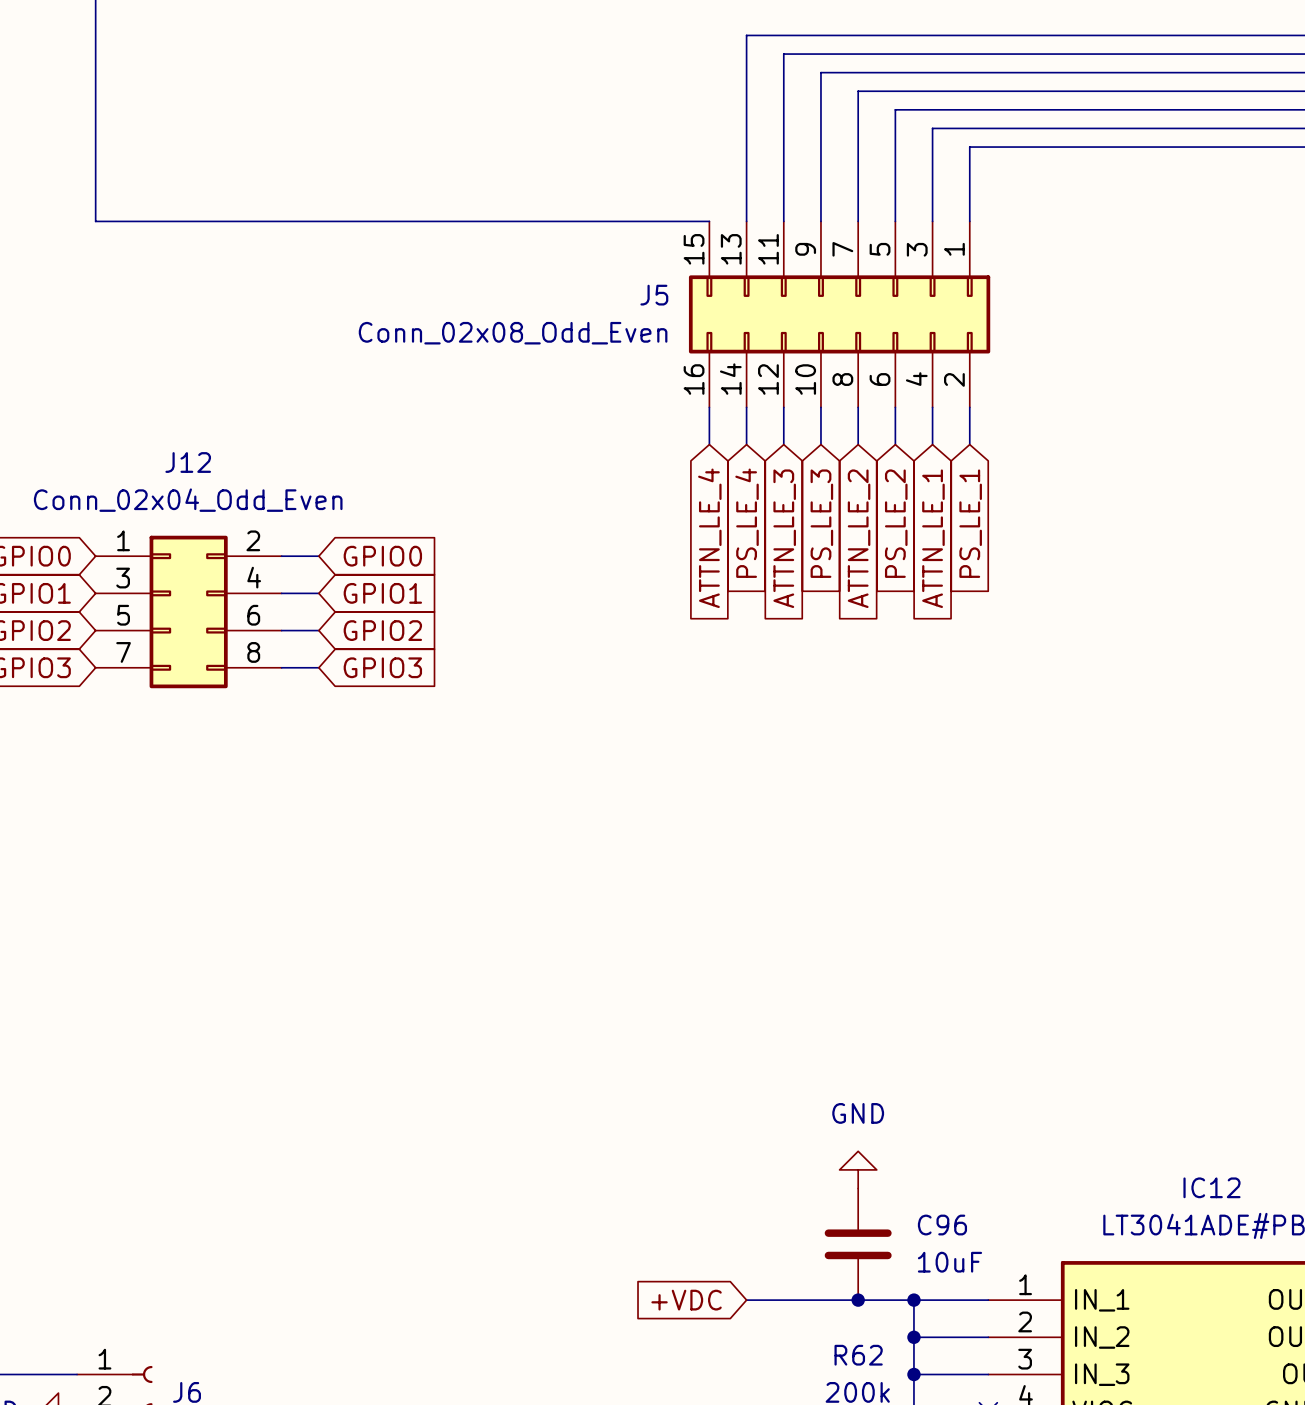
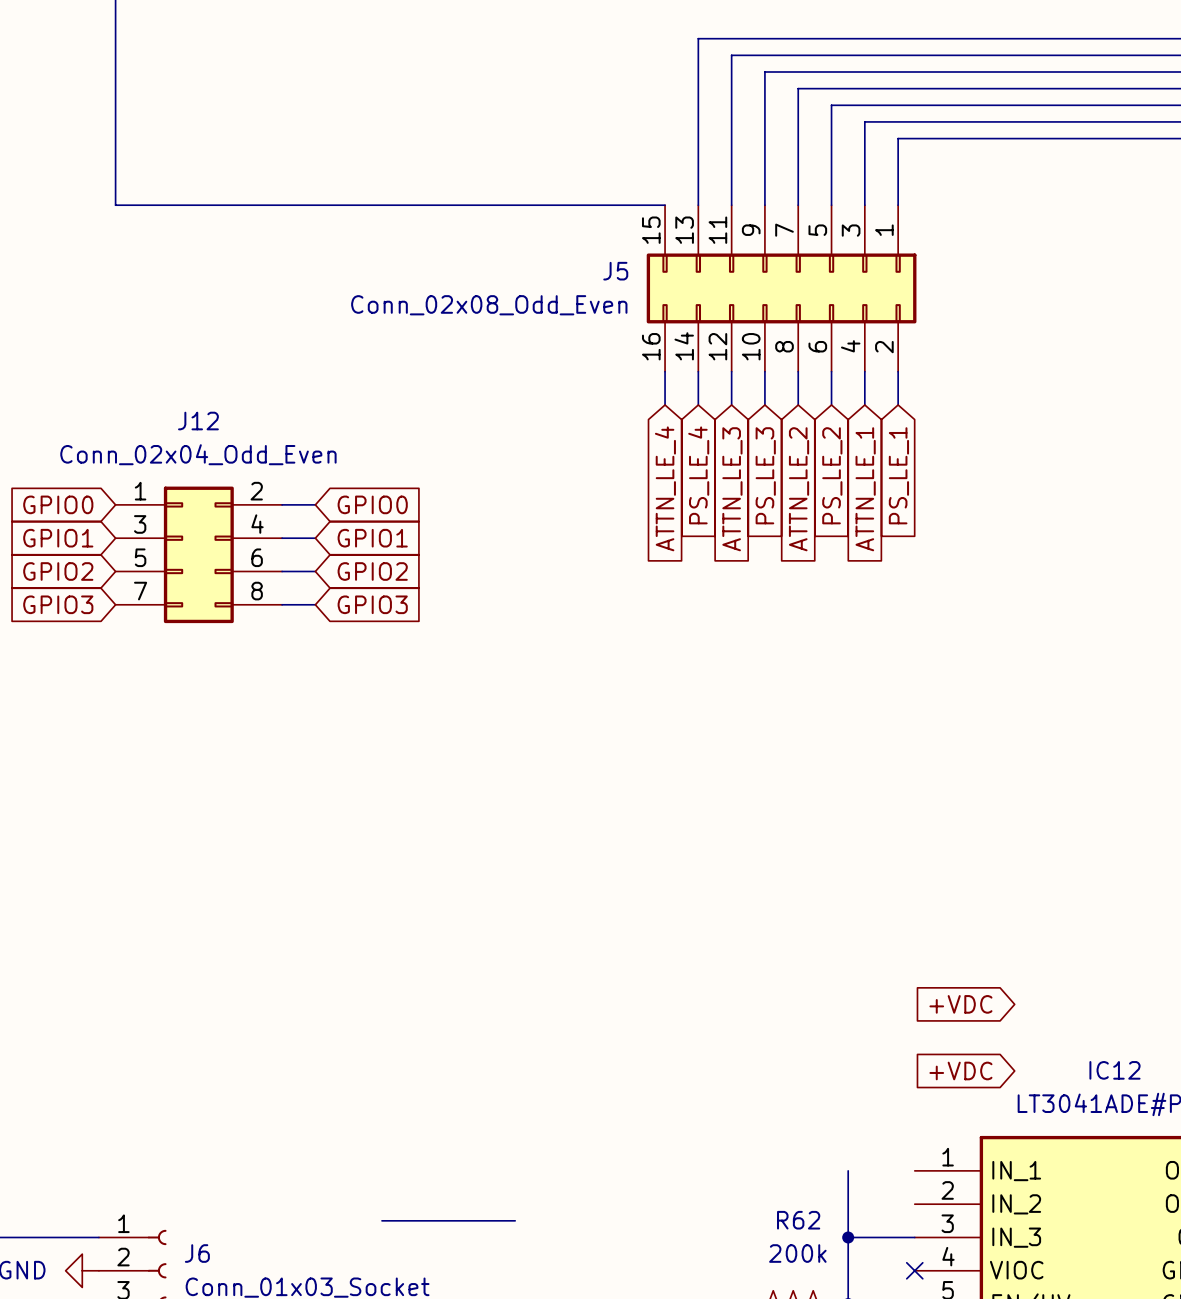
global label: none -> +VDC (960, 1004)
power symbol: GND (858, 1169) -> none
global label: none -> +VDC (960, 1070)
C96: 10uF (858, 1244) -> none
global label: +VDC (686, 1300) -> none
wire: (746, 1300) (988, 1300) -> none
junction: (858, 1300) -> none
junction: (913, 1300) -> none
wire: (913, 1337) (988, 1337) -> none
junction: (913, 1337) -> none
wire: none -> (381, 1220) (515, 1220)

